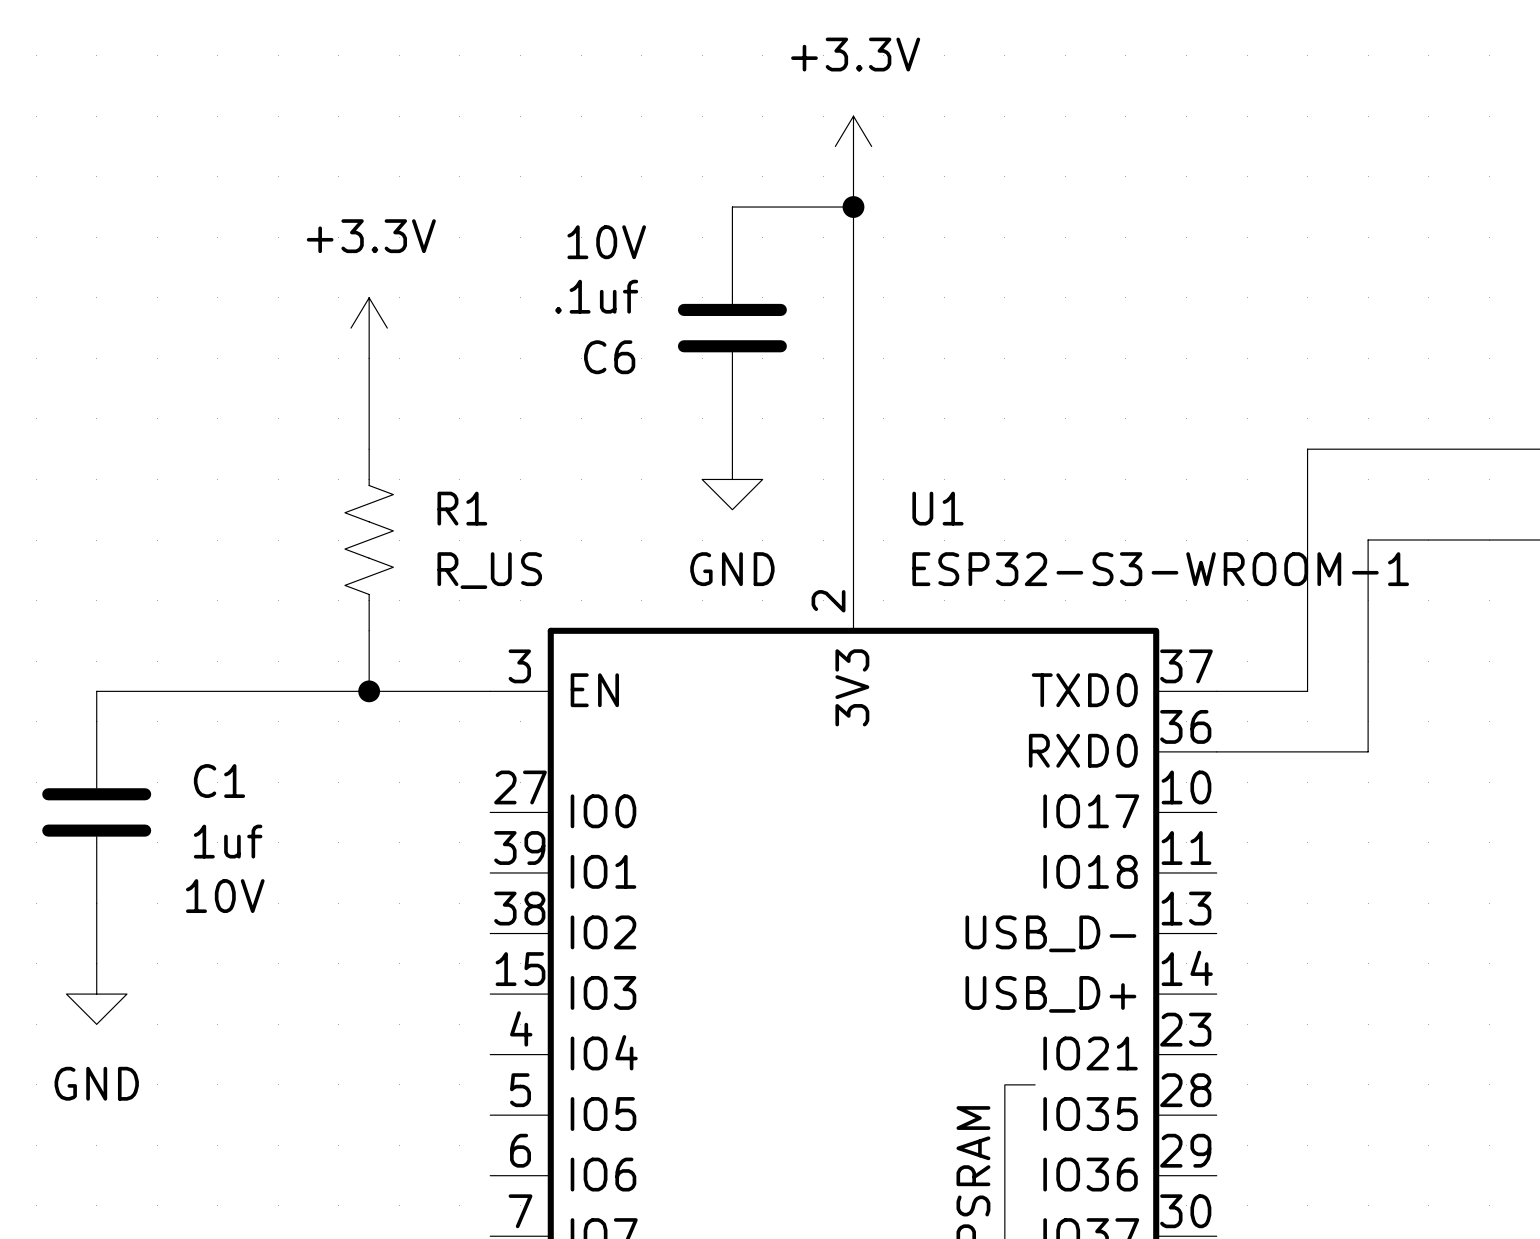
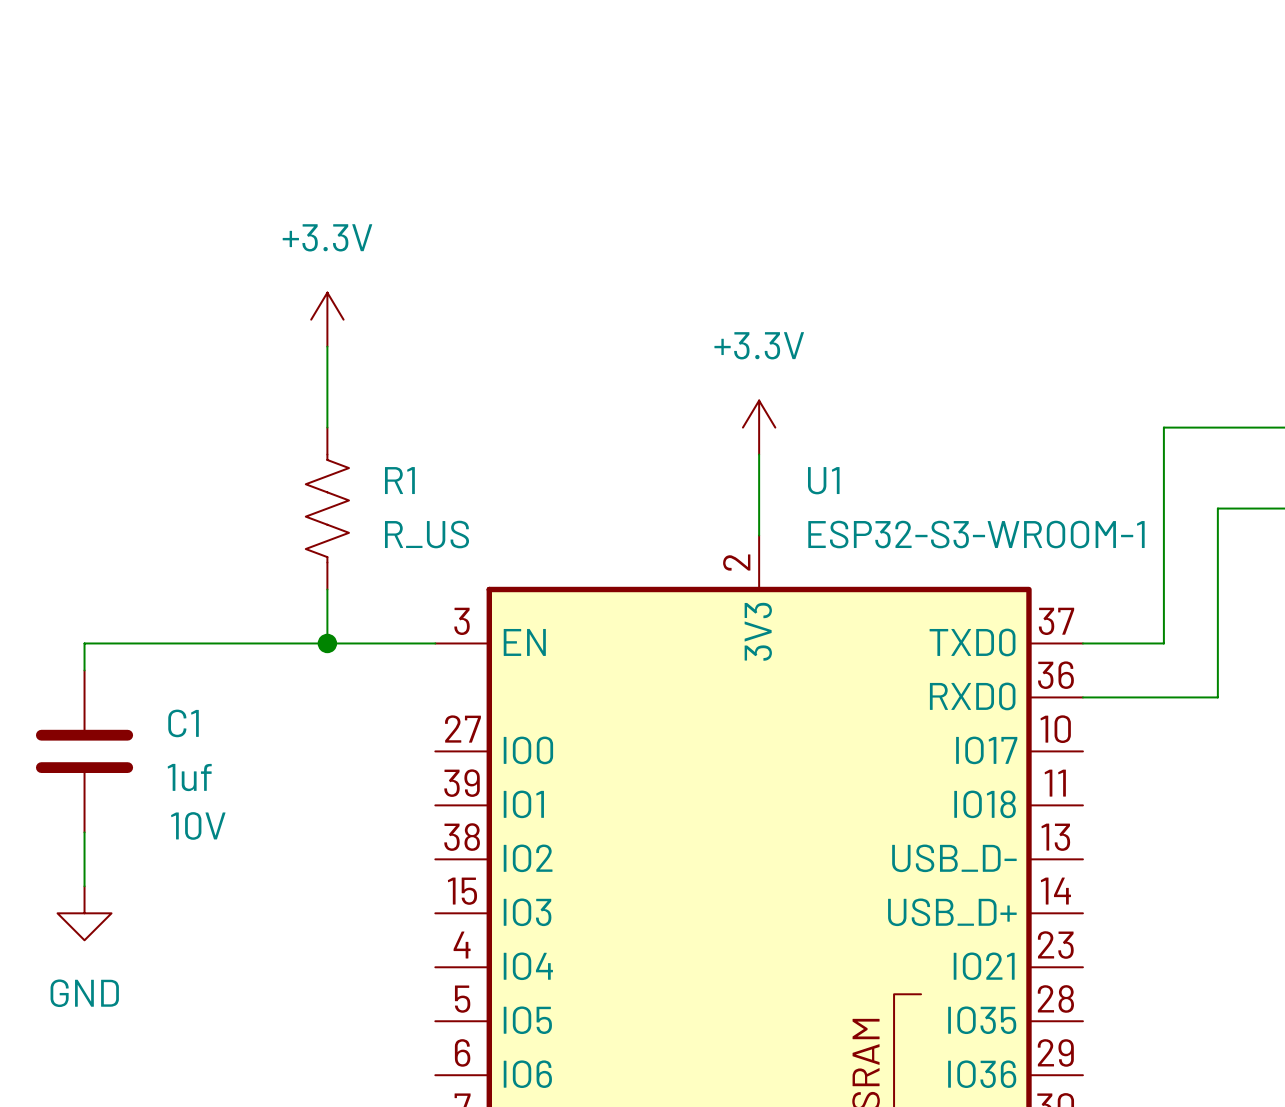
power symbol position: +3.3V (853, 146) -> +3.3V (759, 427)
wire: (853, 176) (853, 479) -> none
wire: (853, 207) (732, 207) (732, 237) -> none
junction: (853, 207) -> none
C6: .1uf (732, 328) -> none
wire: (732, 418) (732, 449) -> none
power symbol: GND (732, 479) -> none

